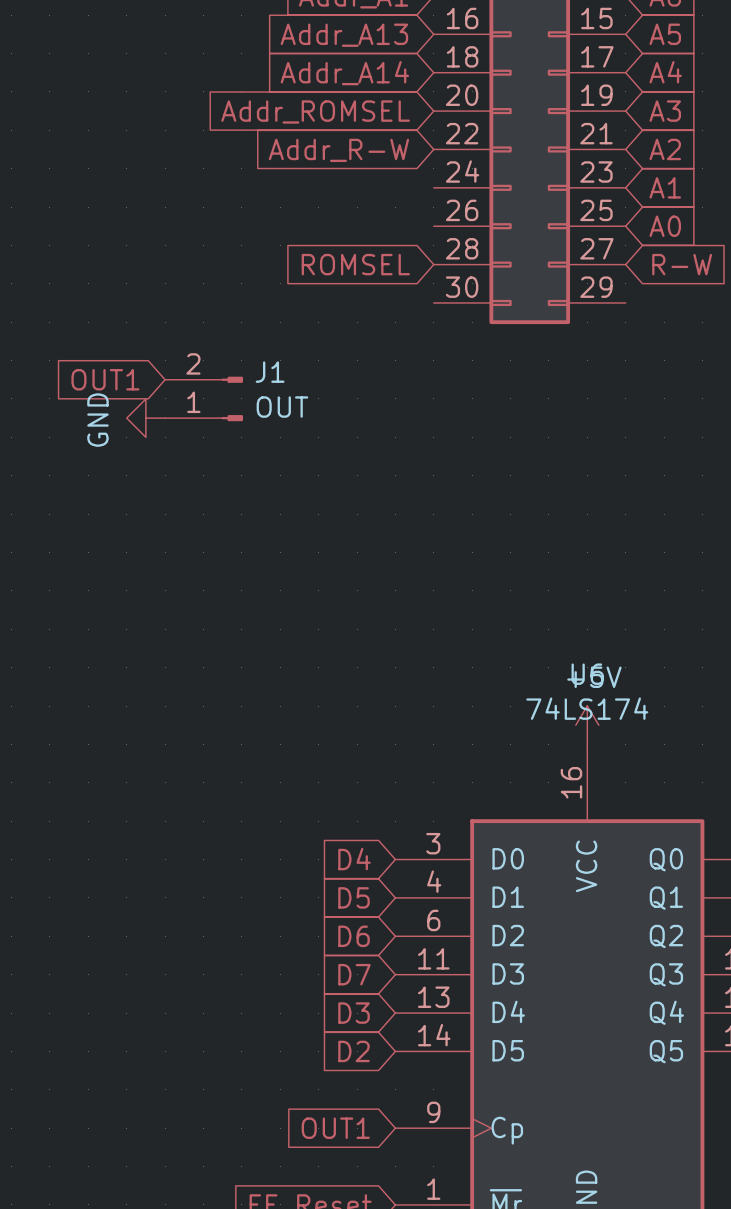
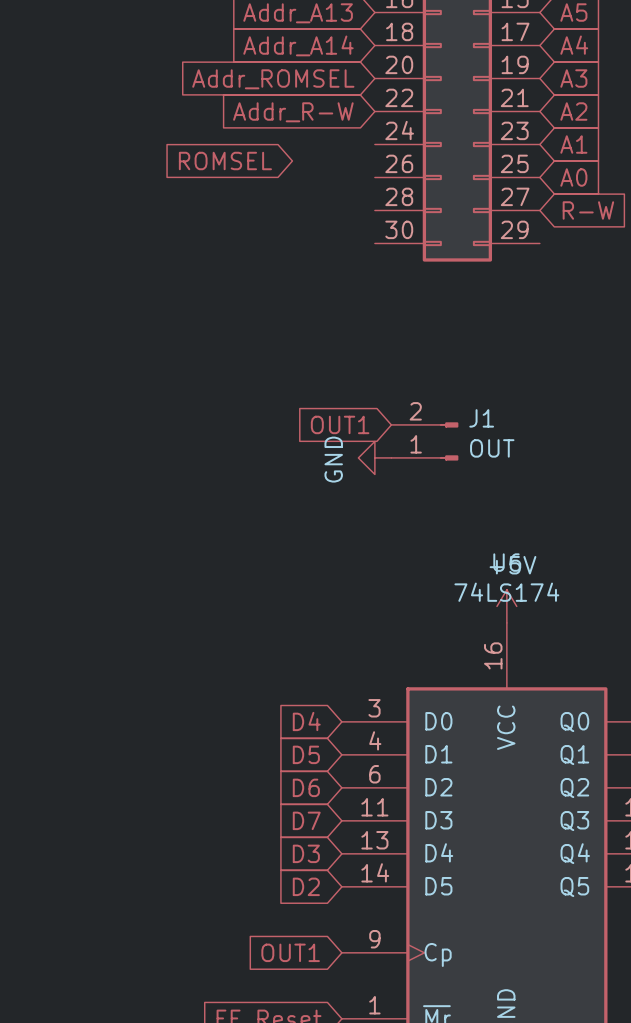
global label position: ROMSEL (355, 264) -> ROMSEL (225, 161)
global label position: OUT1 (105, 379) -> OUT1 (340, 424)
J1 position: (204, 398) -> (424, 441)
power symbol position: GND (145, 418) -> GND (374, 457)

